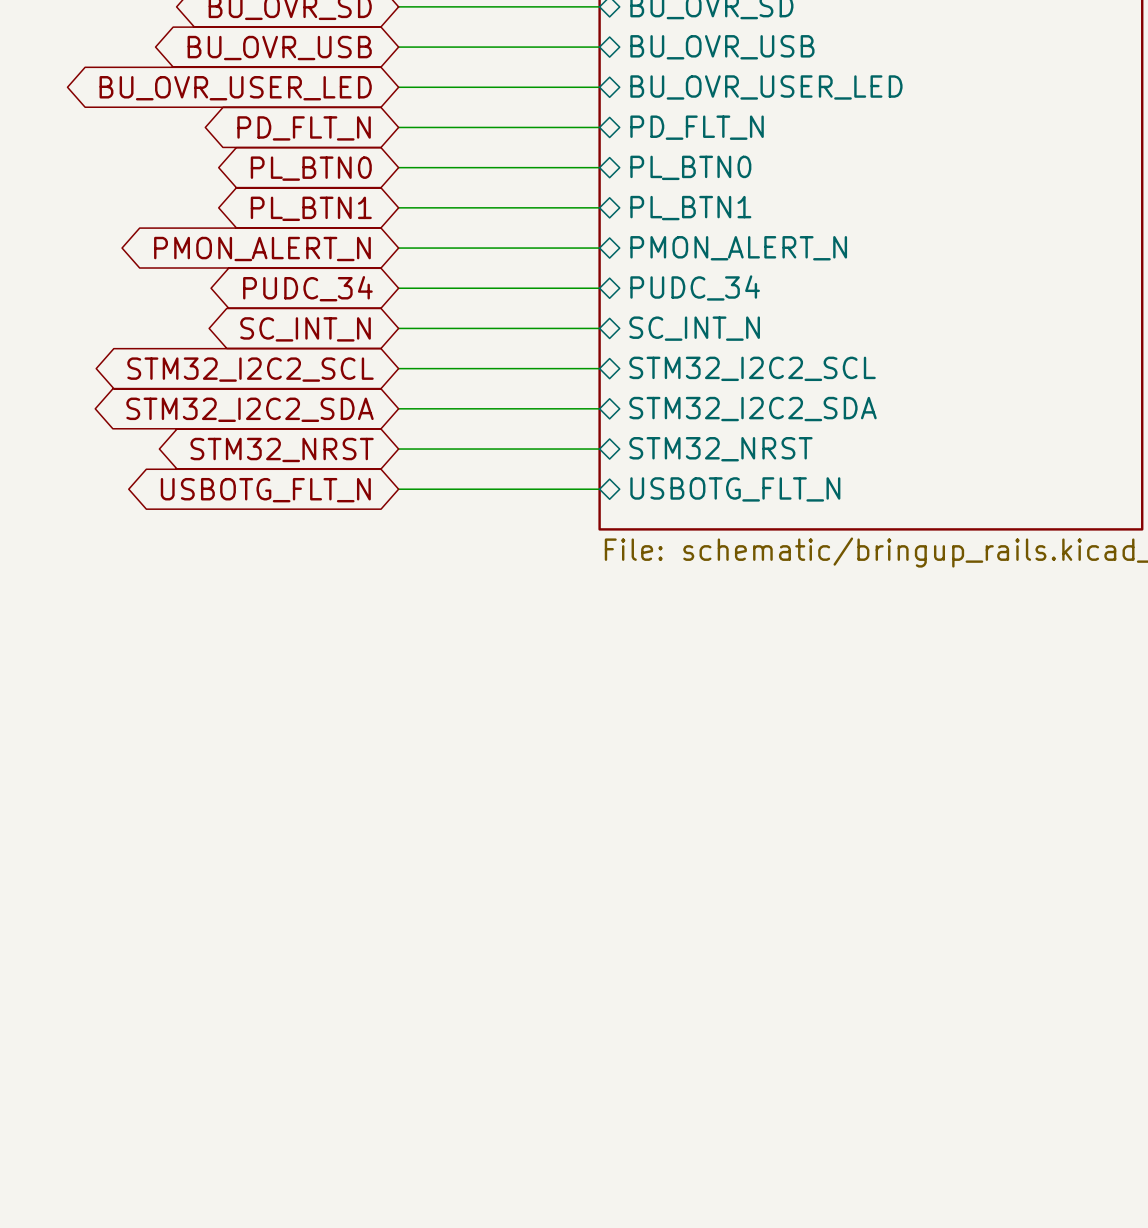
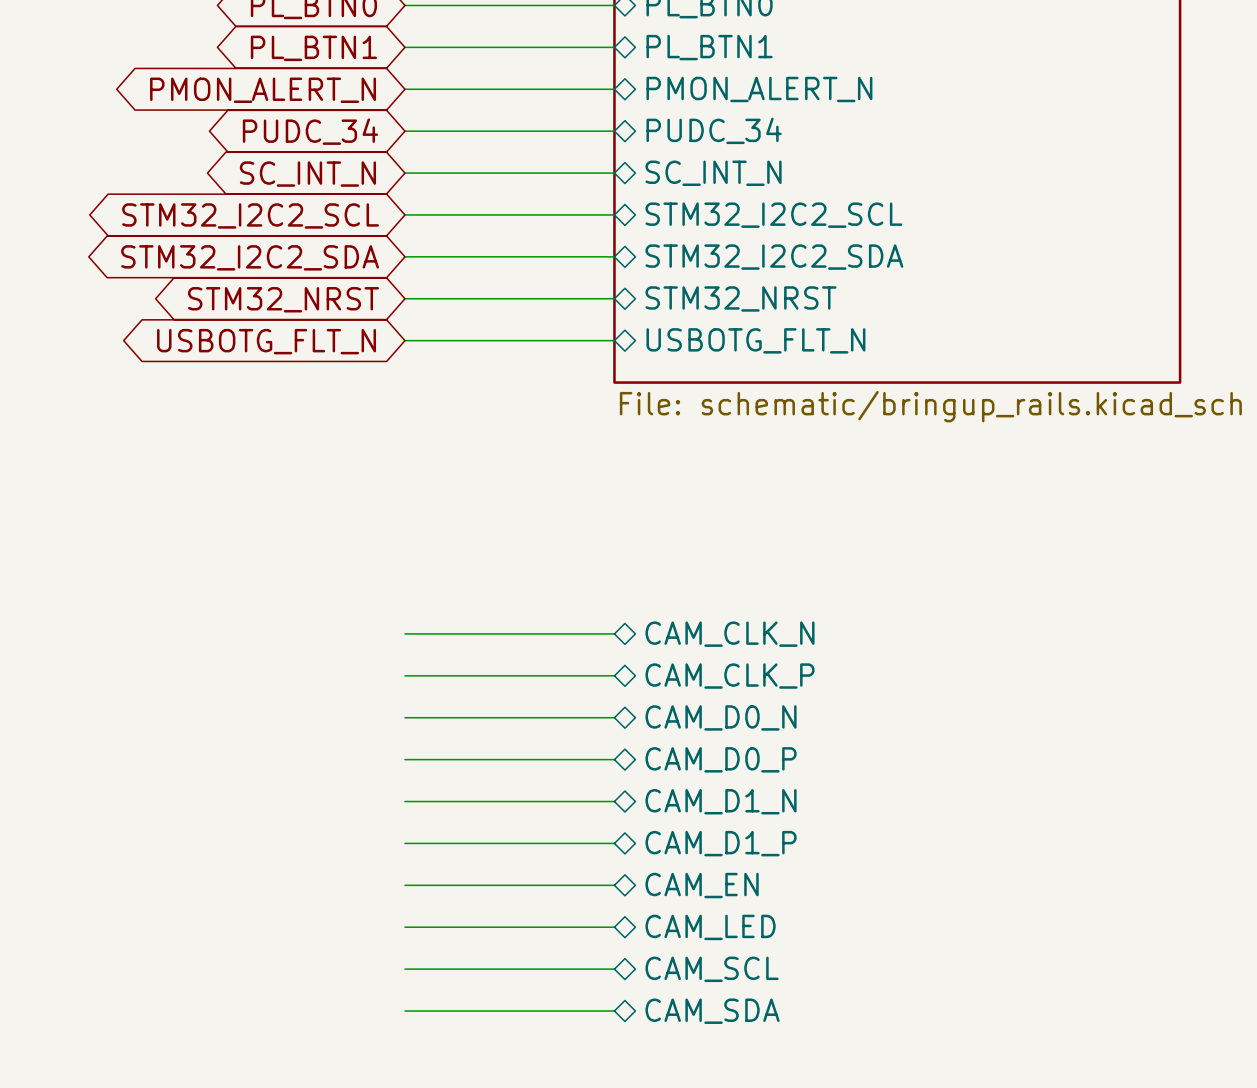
wire: none -> (404, 633) (614, 633)
sheet pin: none -> CAM_CLK_N (730, 634)
wire: none -> (404, 675) (614, 675)
sheet pin: none -> CAM_CLK_P (730, 676)
wire: none -> (404, 717) (614, 717)
sheet pin: none -> CAM_D0_N (721, 717)
wire: none -> (404, 759) (614, 759)
sheet pin: none -> CAM_D0_P (721, 759)
wire: none -> (404, 801) (614, 801)
sheet pin: none -> CAM_D1_N (721, 801)
wire: none -> (404, 843) (614, 843)
sheet pin: none -> CAM_D1_P (721, 843)
wire: none -> (404, 885) (614, 885)
sheet pin: none -> CAM_EN (702, 885)
wire: none -> (404, 927) (614, 927)
sheet pin: none -> CAM_LED (710, 927)
wire: none -> (404, 969) (614, 969)
sheet pin: none -> CAM_SCL (712, 969)
wire: none -> (404, 1011) (614, 1011)
sheet pin: none -> CAM_SDA (712, 1011)

